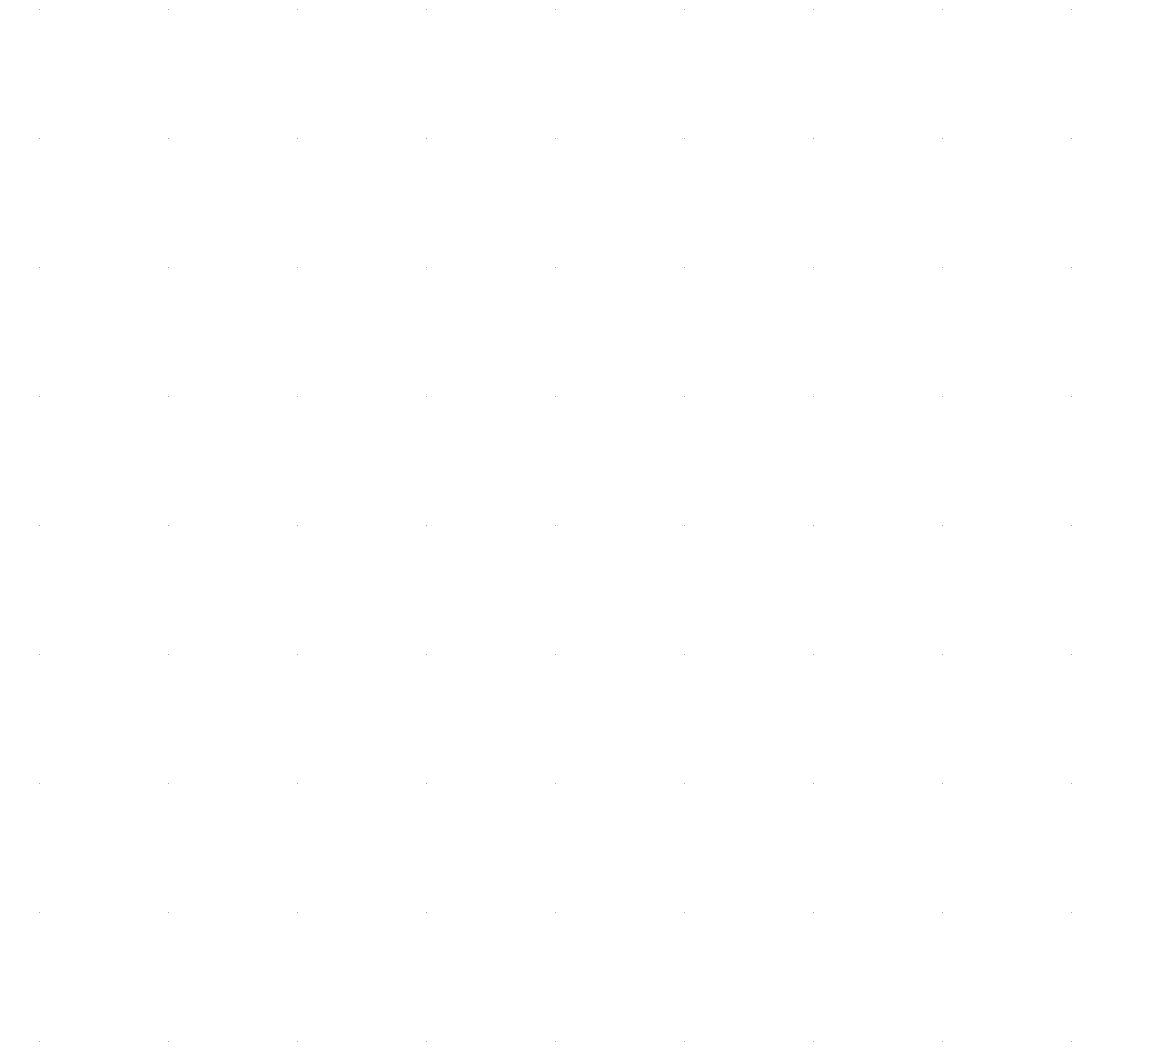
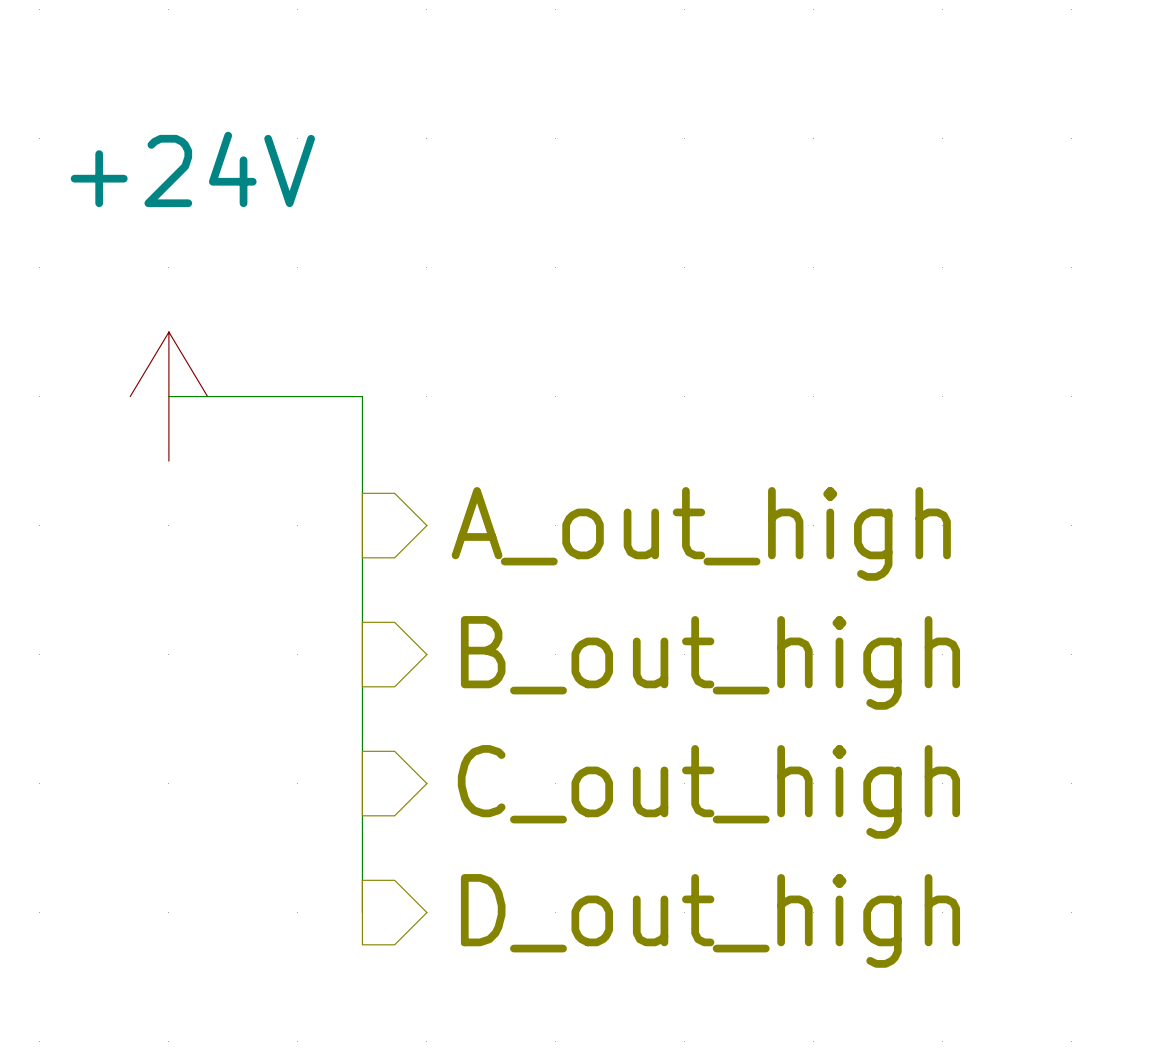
wire: none -> (168, 396) (362, 396) (362, 912)
power symbol: none -> +24V (168, 396)
hierarchical label: none -> A_out_high (701, 533)
hierarchical label: none -> B_out_high (710, 662)
hierarchical label: none -> C_out_high (708, 791)
hierarchical label: none -> D_out_high (710, 920)

